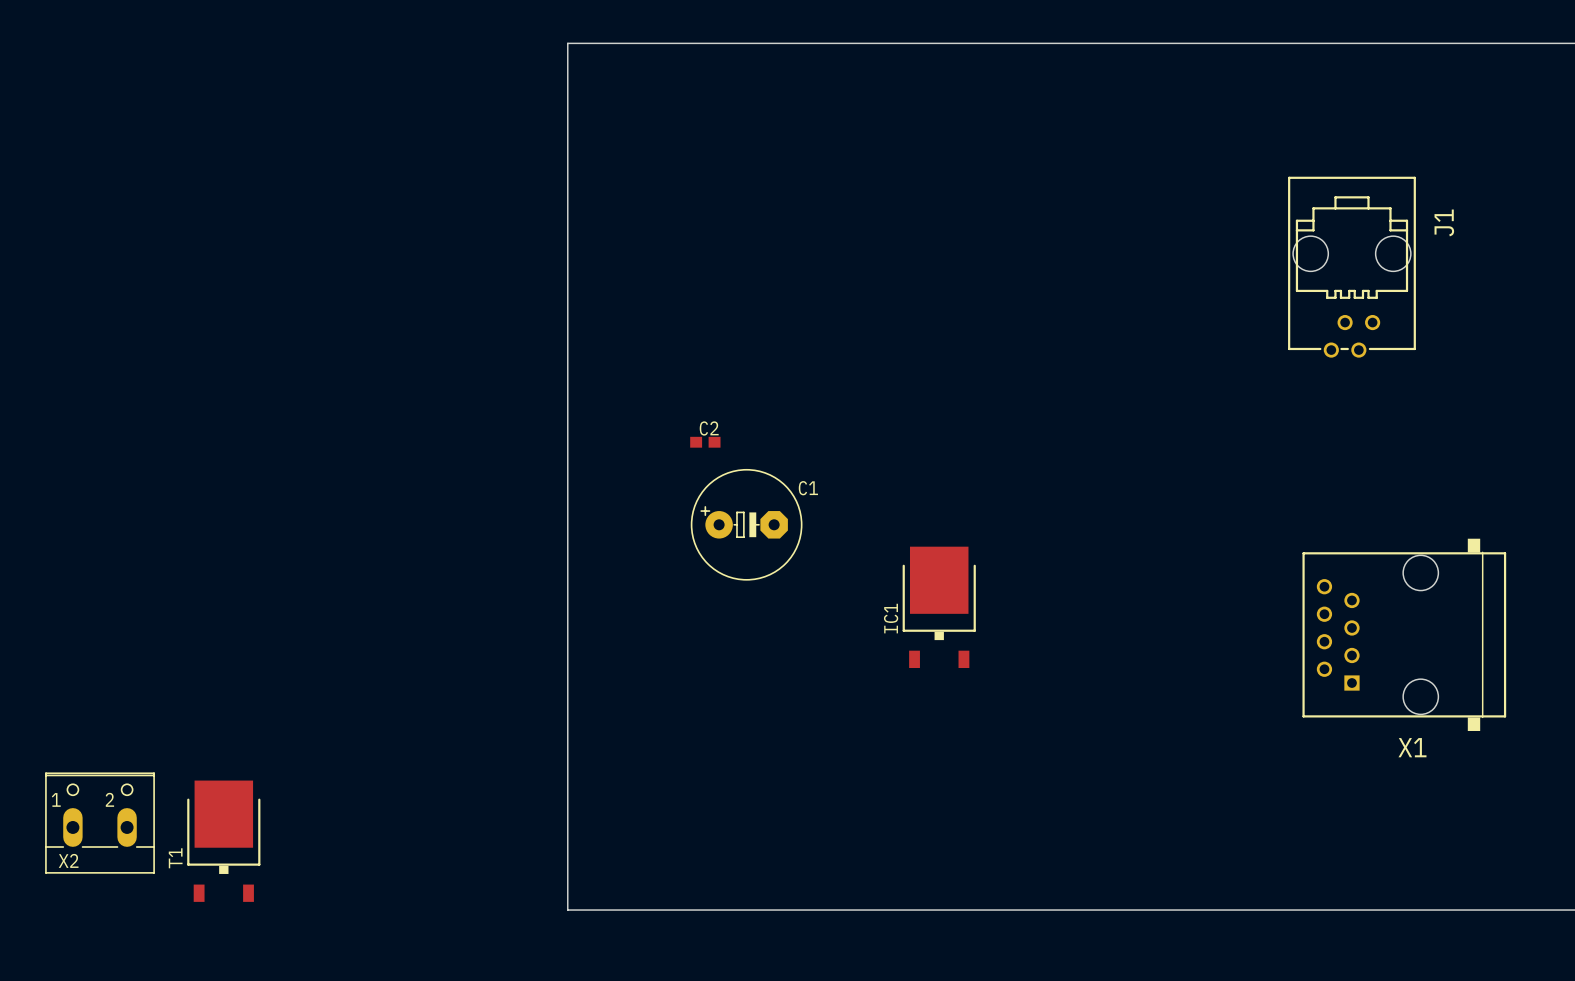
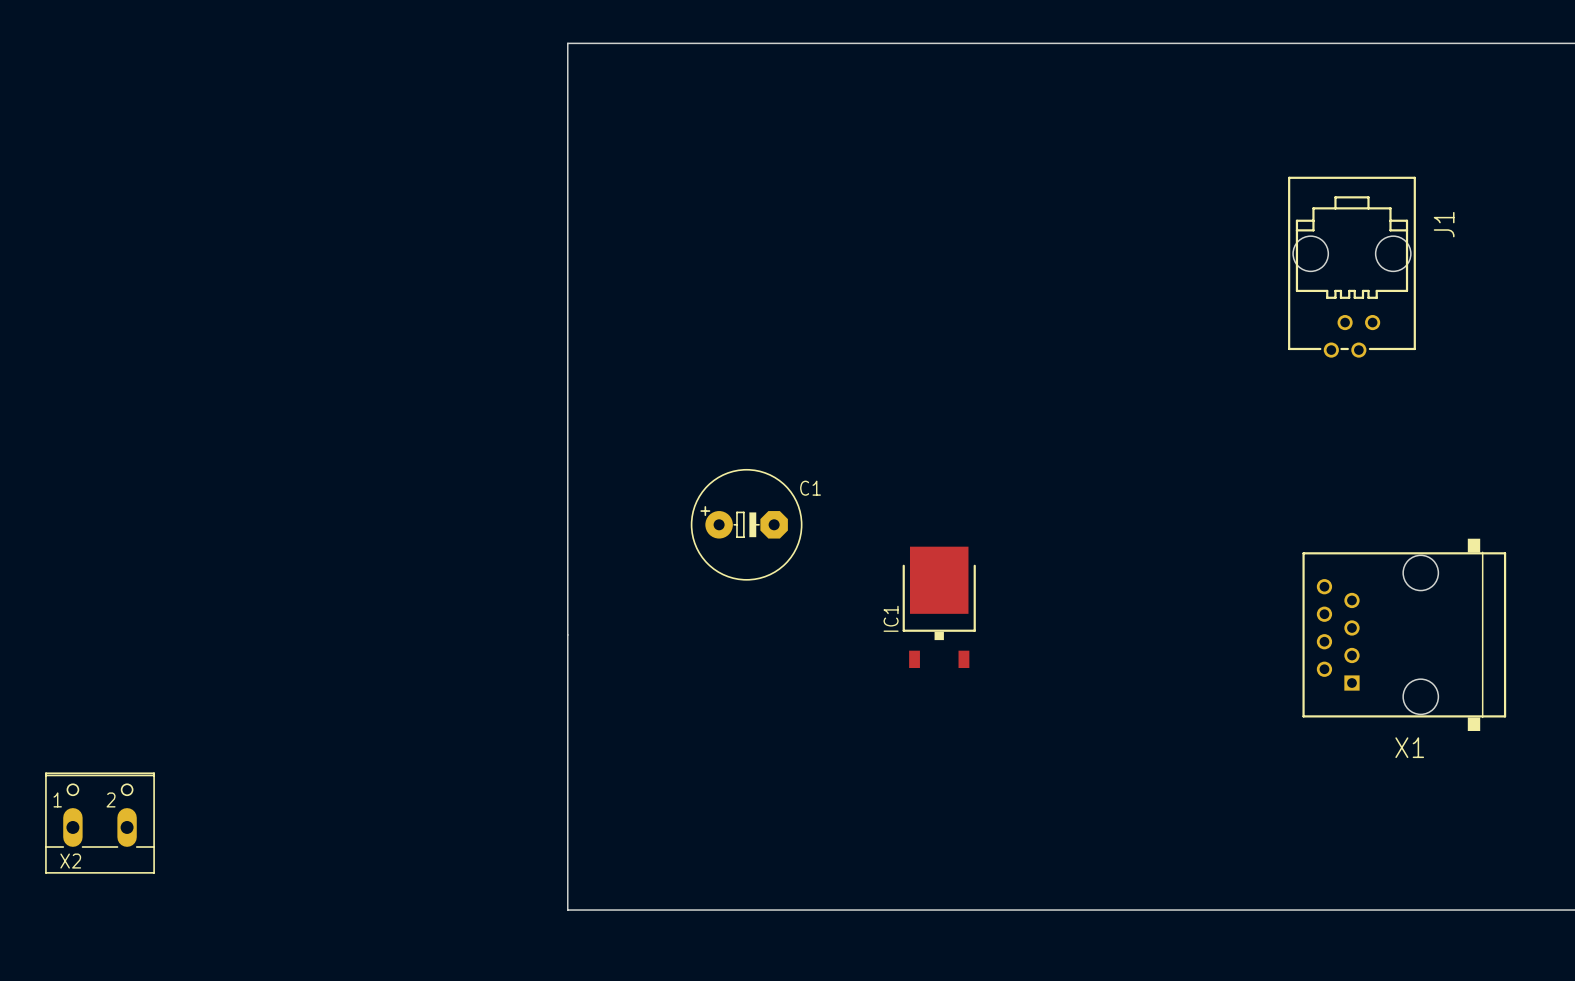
C2: (705, 442) -> none
T1: (223, 841) -> none

